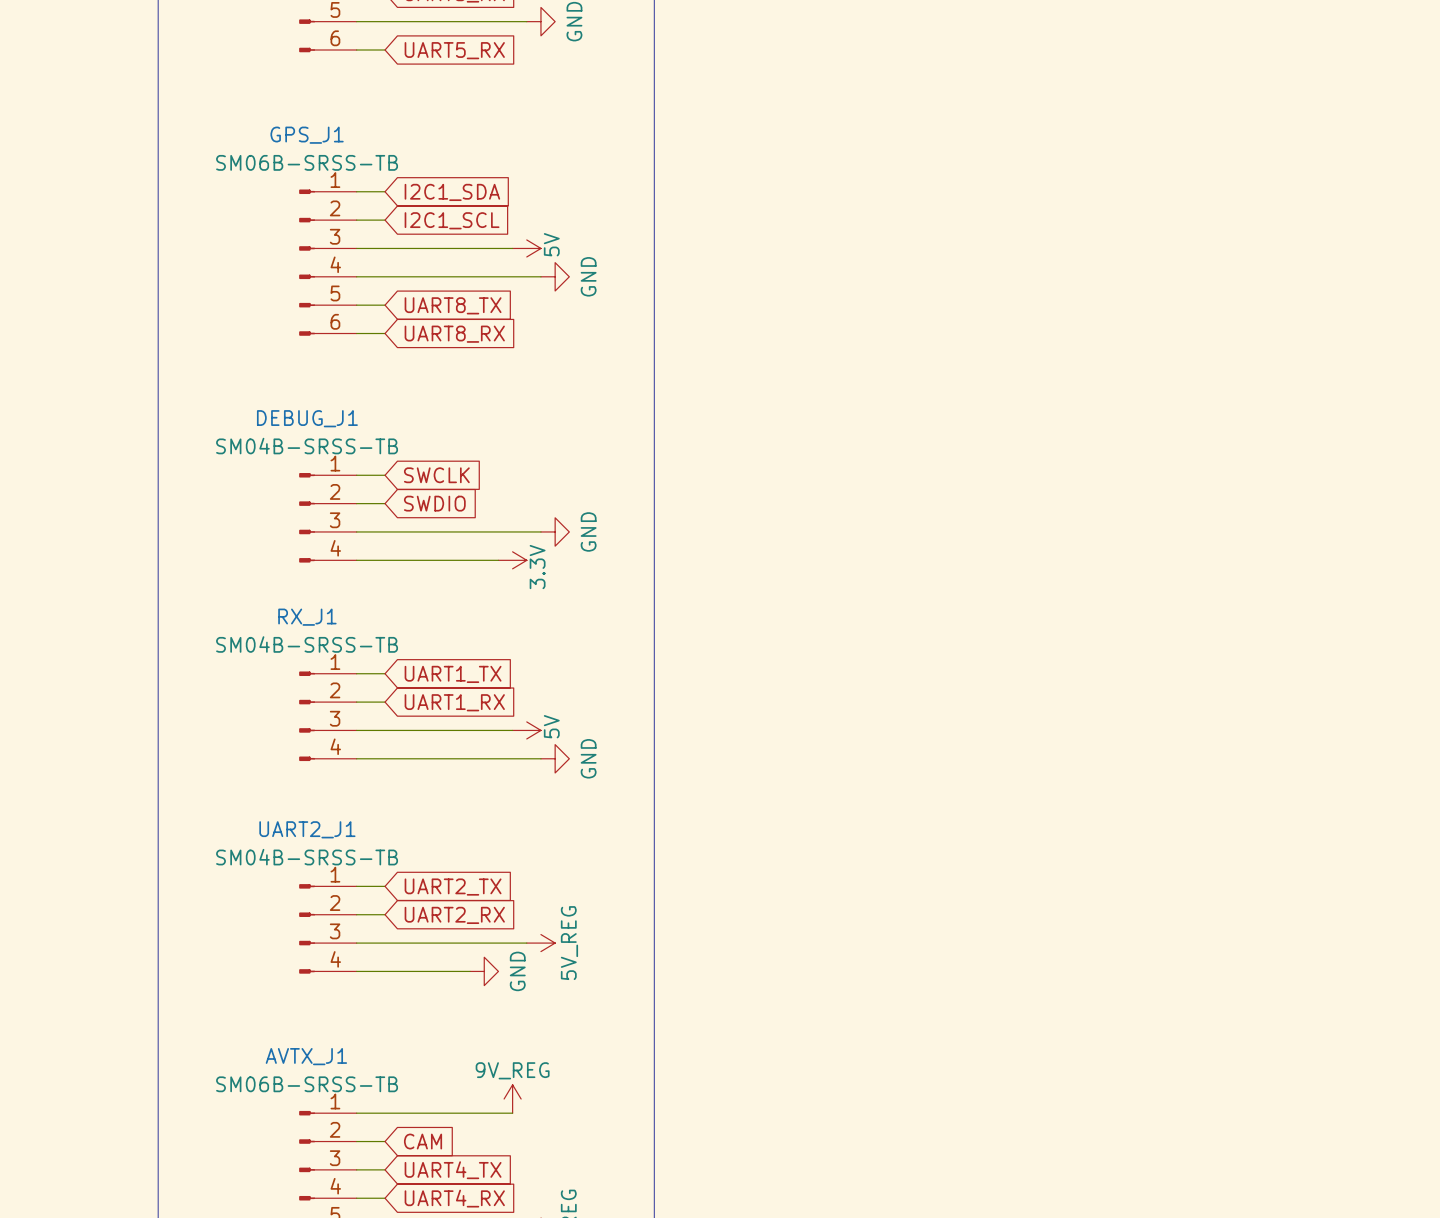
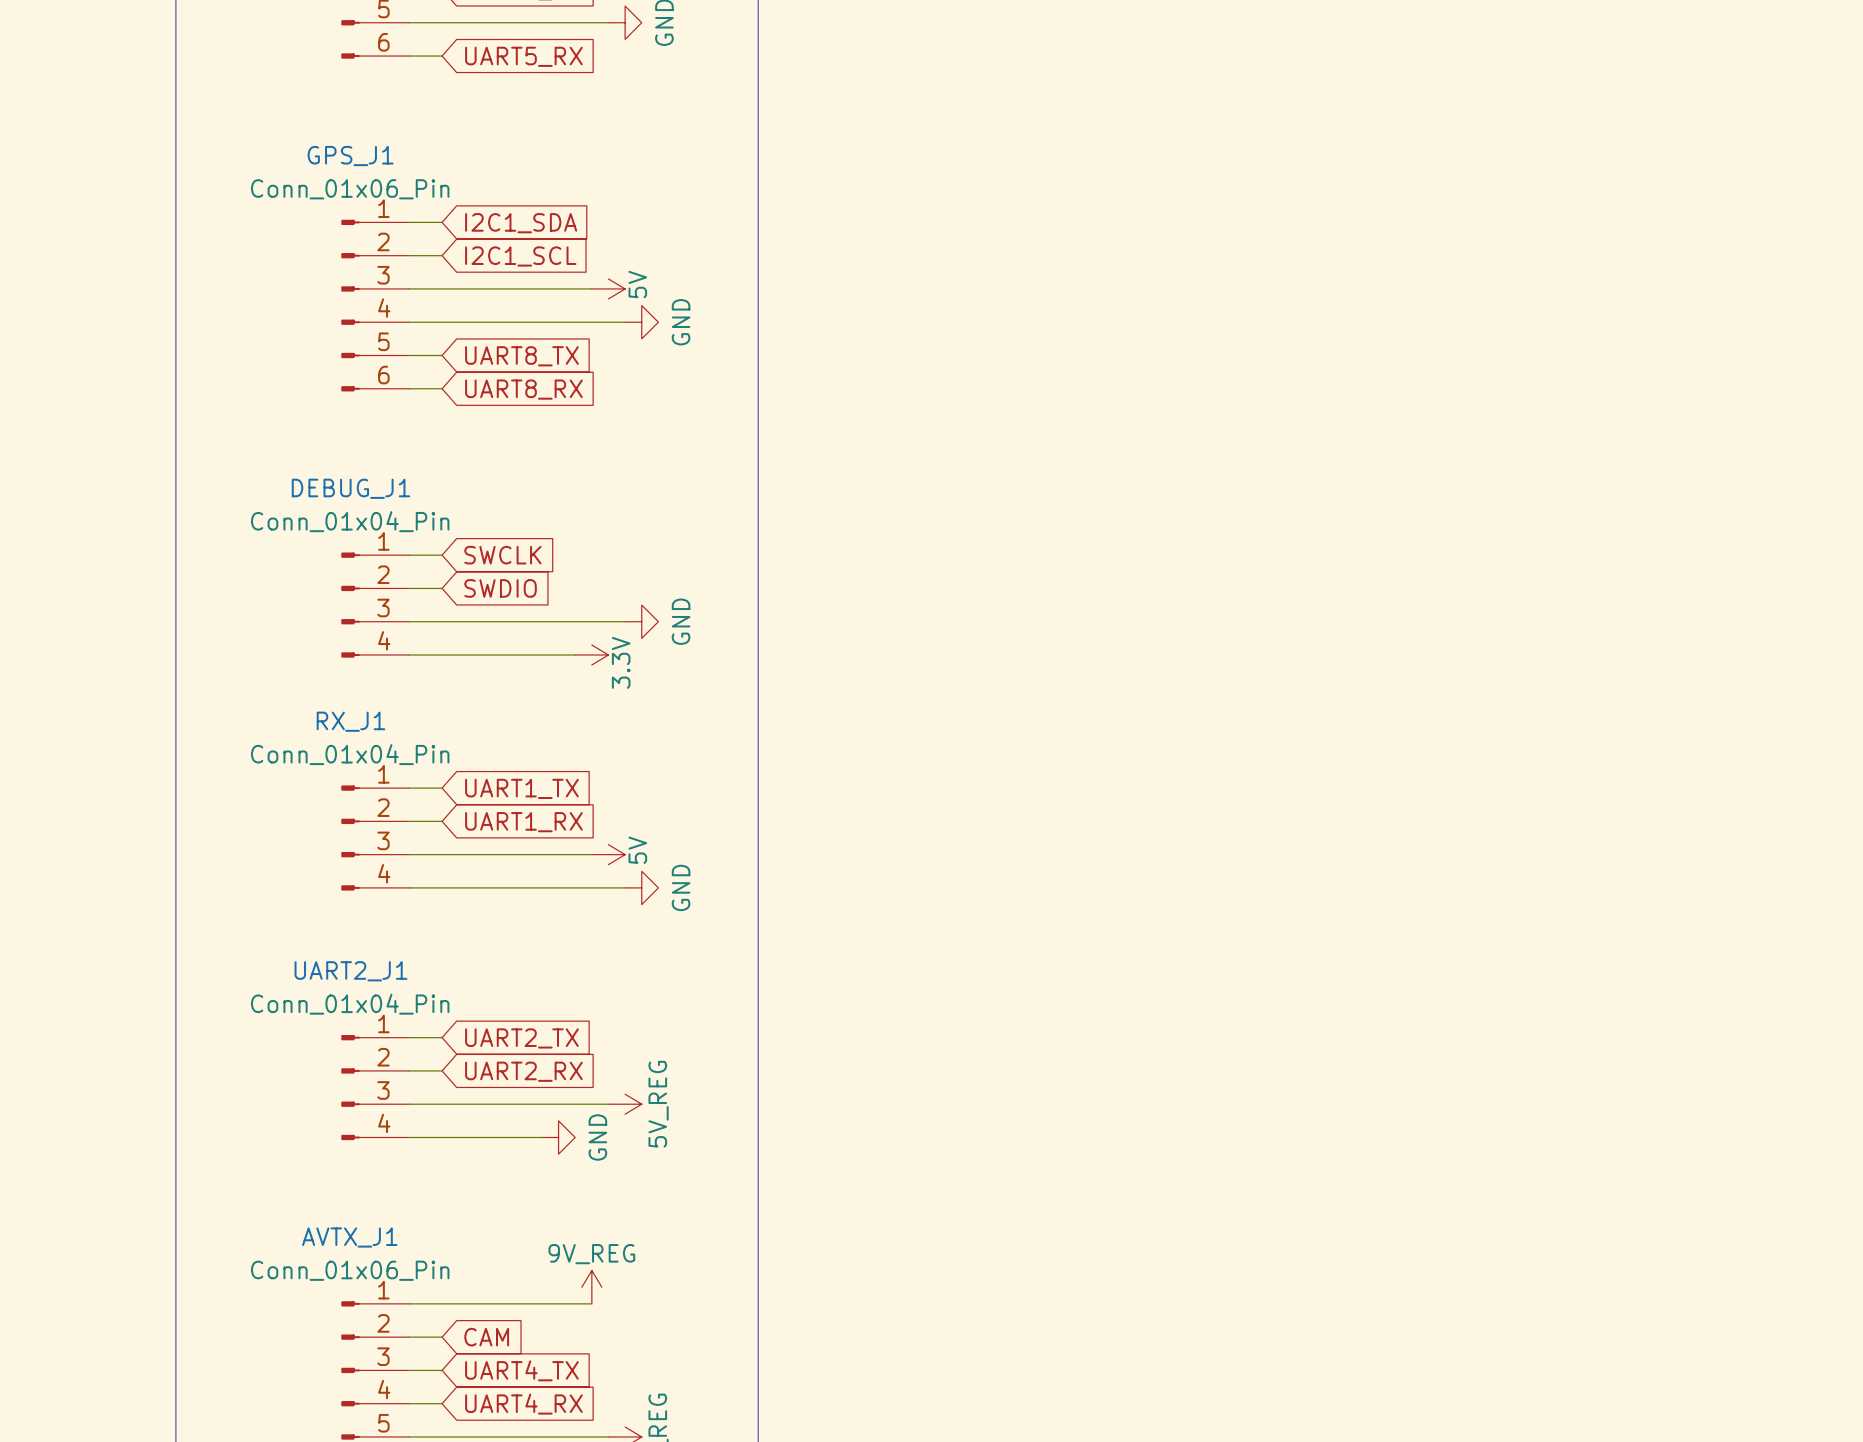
GPS_J1 value: SM06B-SRSS-TB (307, 162) -> Conn_01x06_Pin (350, 189)
DEBUG_J1 value: SM04B-SRSS-TB (307, 446) -> Conn_01x04_Pin (350, 521)
RX_J1 value: SM04B-SRSS-TB (307, 644) -> Conn_01x04_Pin (350, 754)
UART2_J1 value: SM04B-SRSS-TB (307, 857) -> Conn_01x04_Pin (350, 1004)
AVTX_J1 value: SM06B-SRSS-TB (307, 1084) -> Conn_01x06_Pin (350, 1270)

